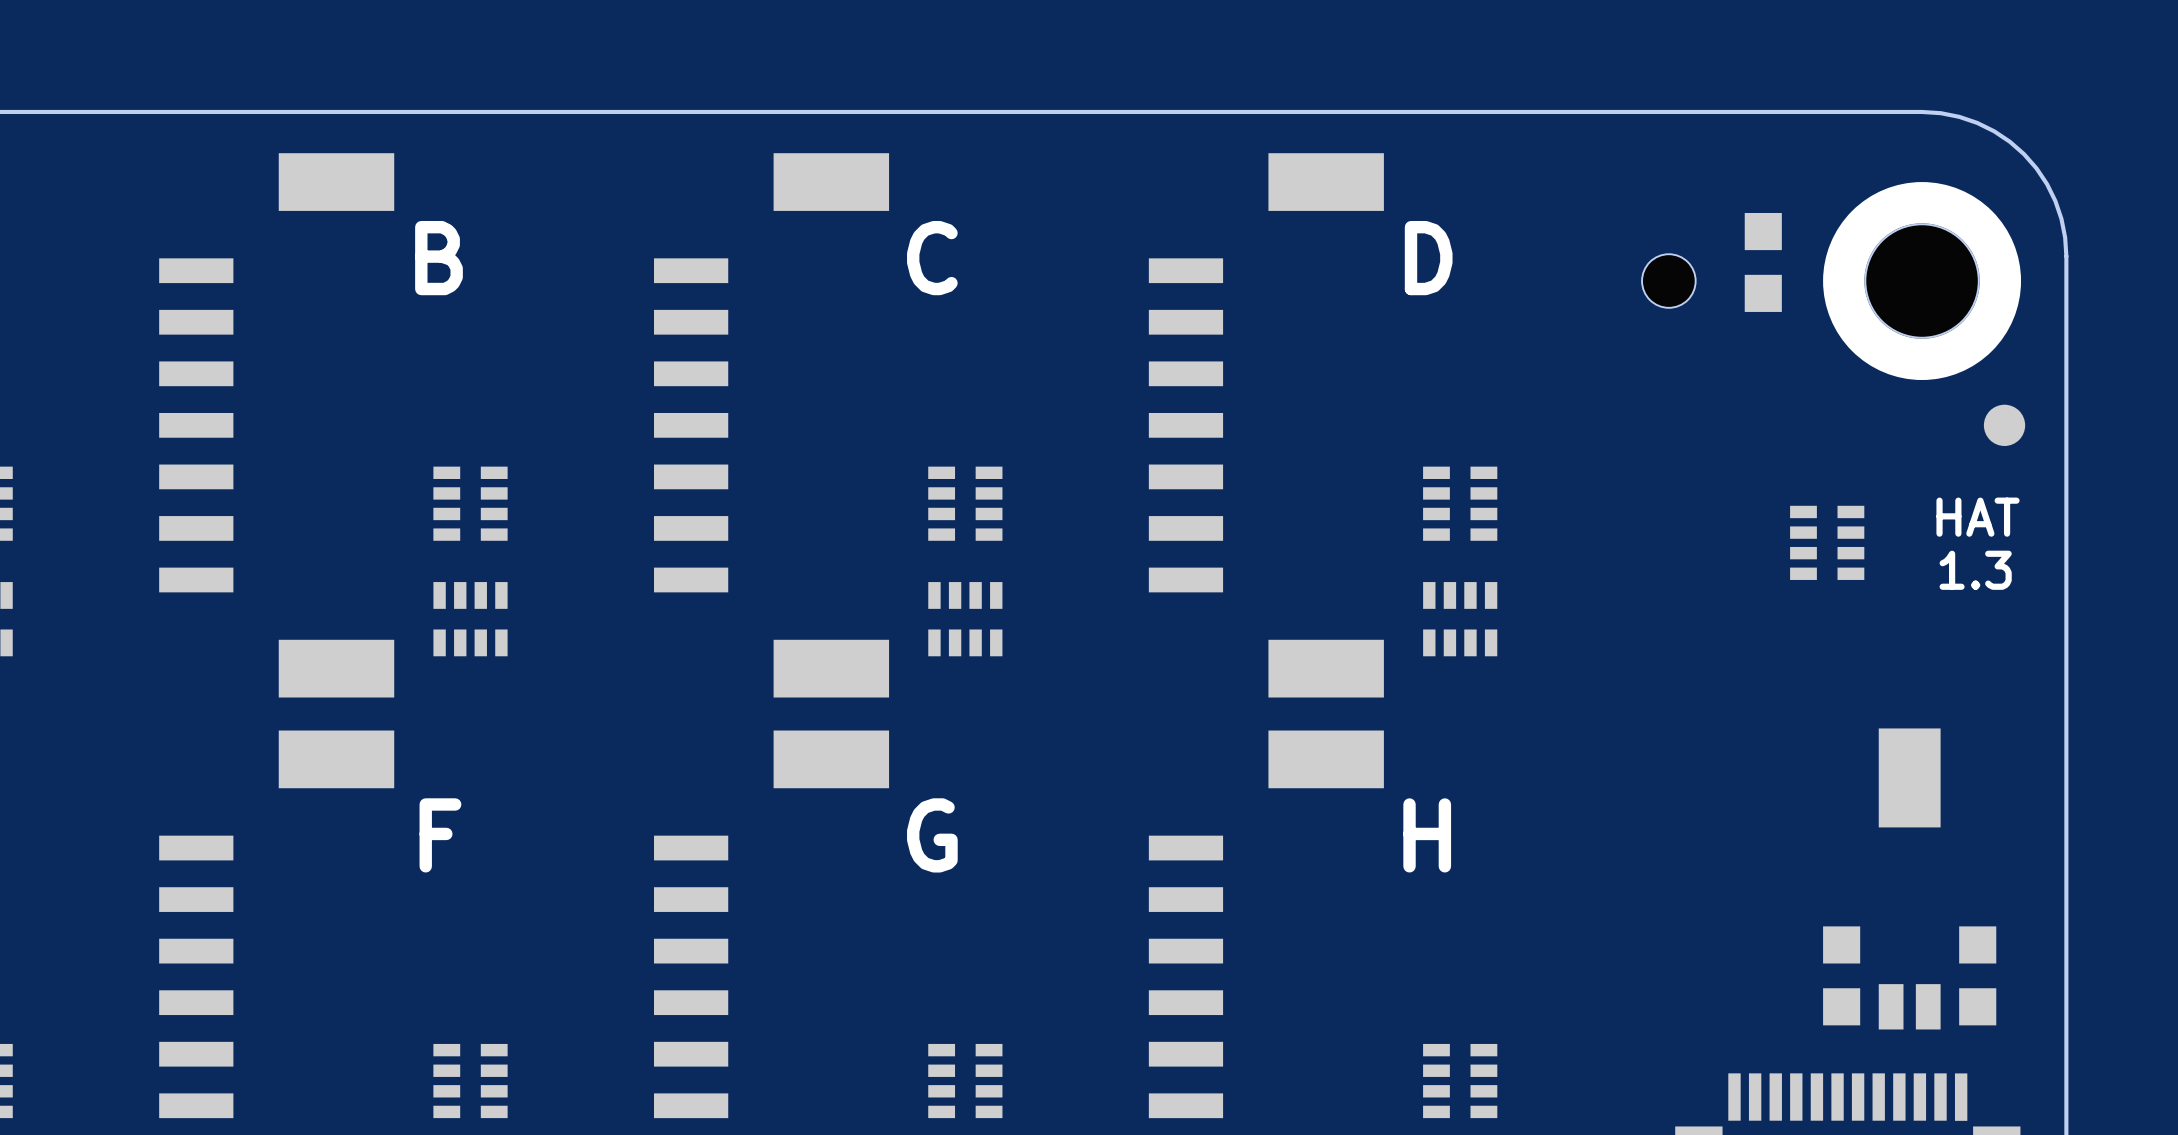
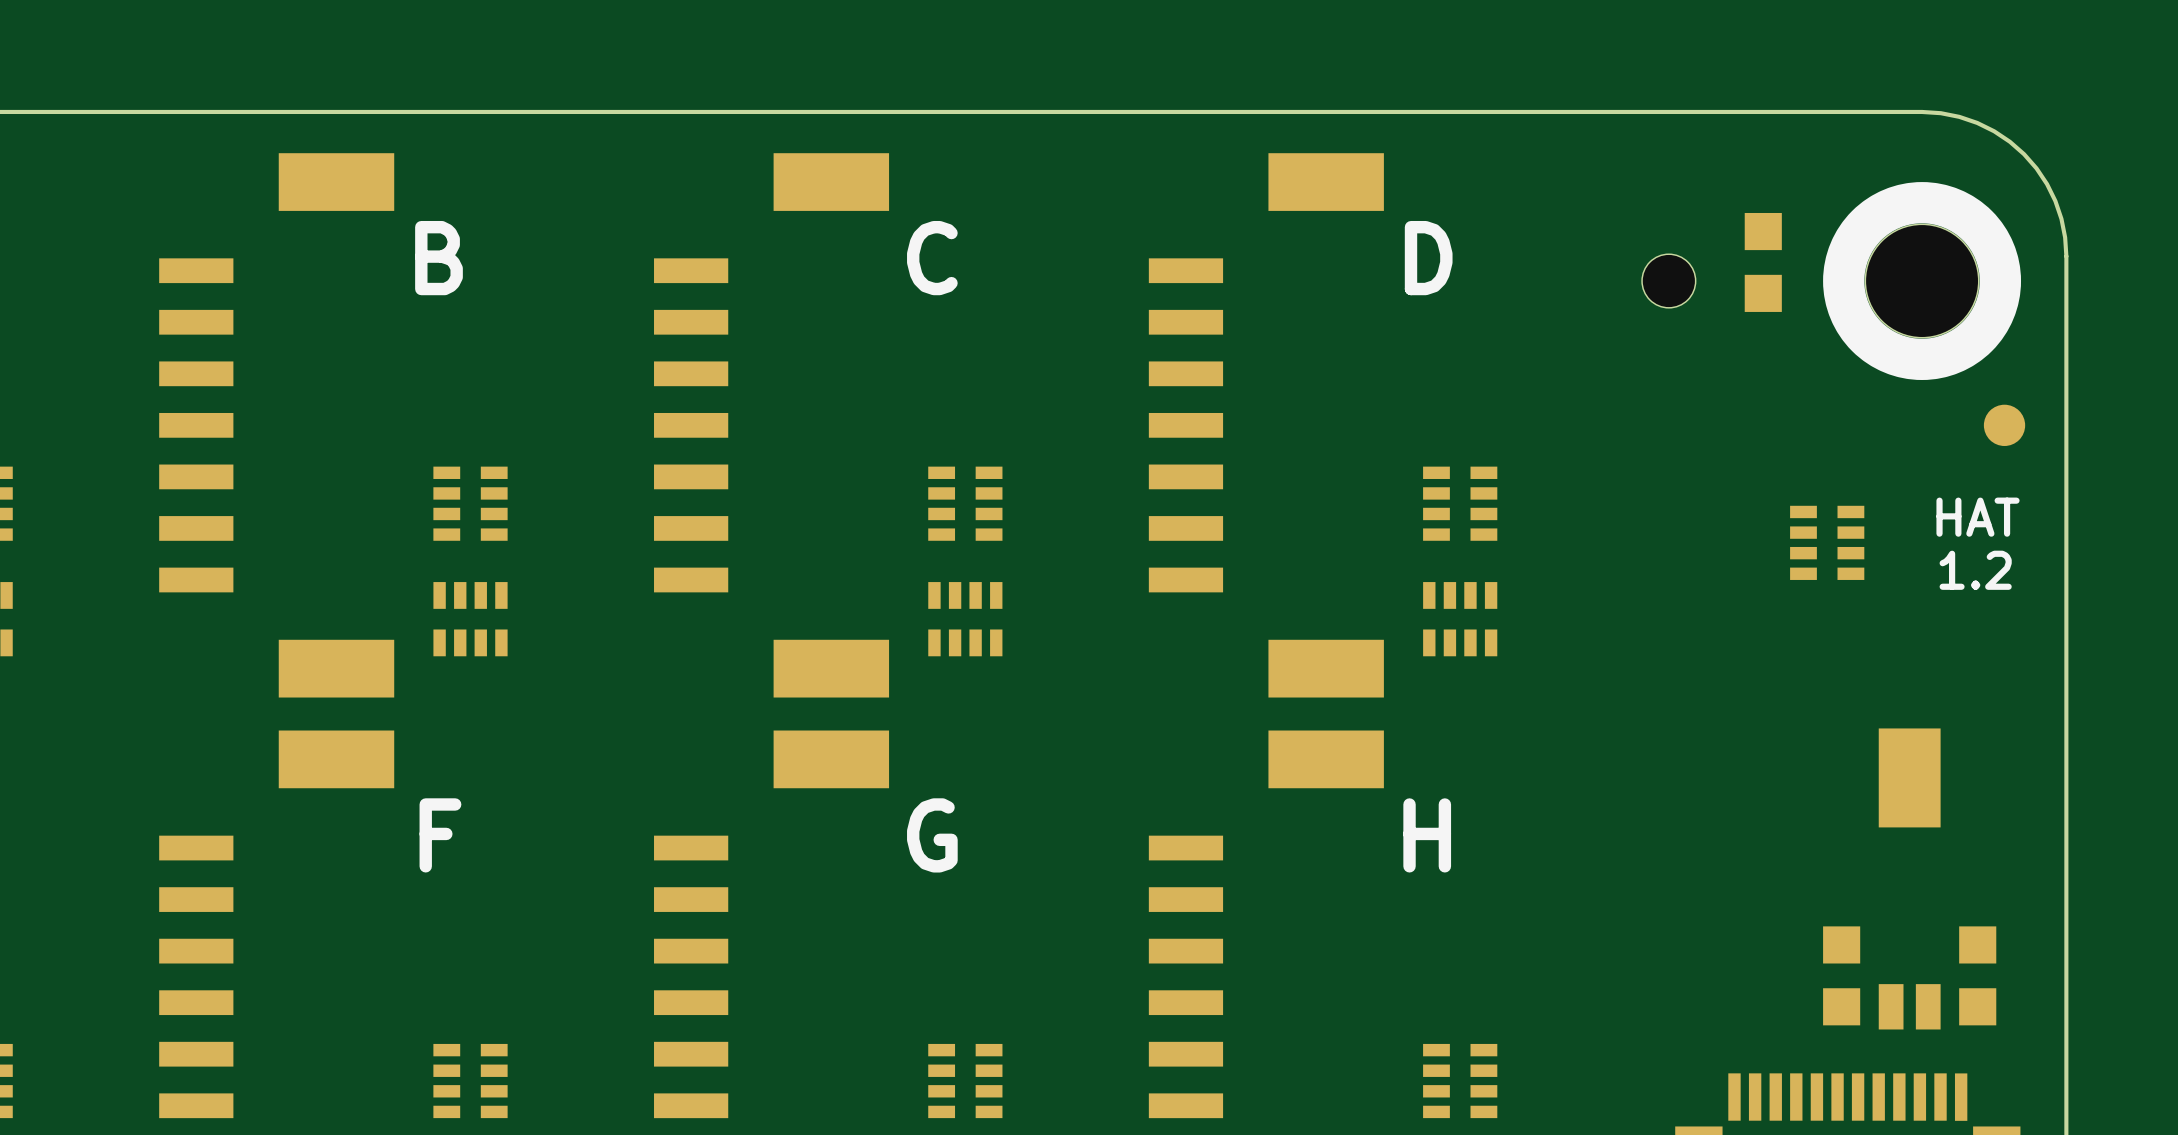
text: 1.3 (1975, 570) -> 1.2 (1975, 570)

